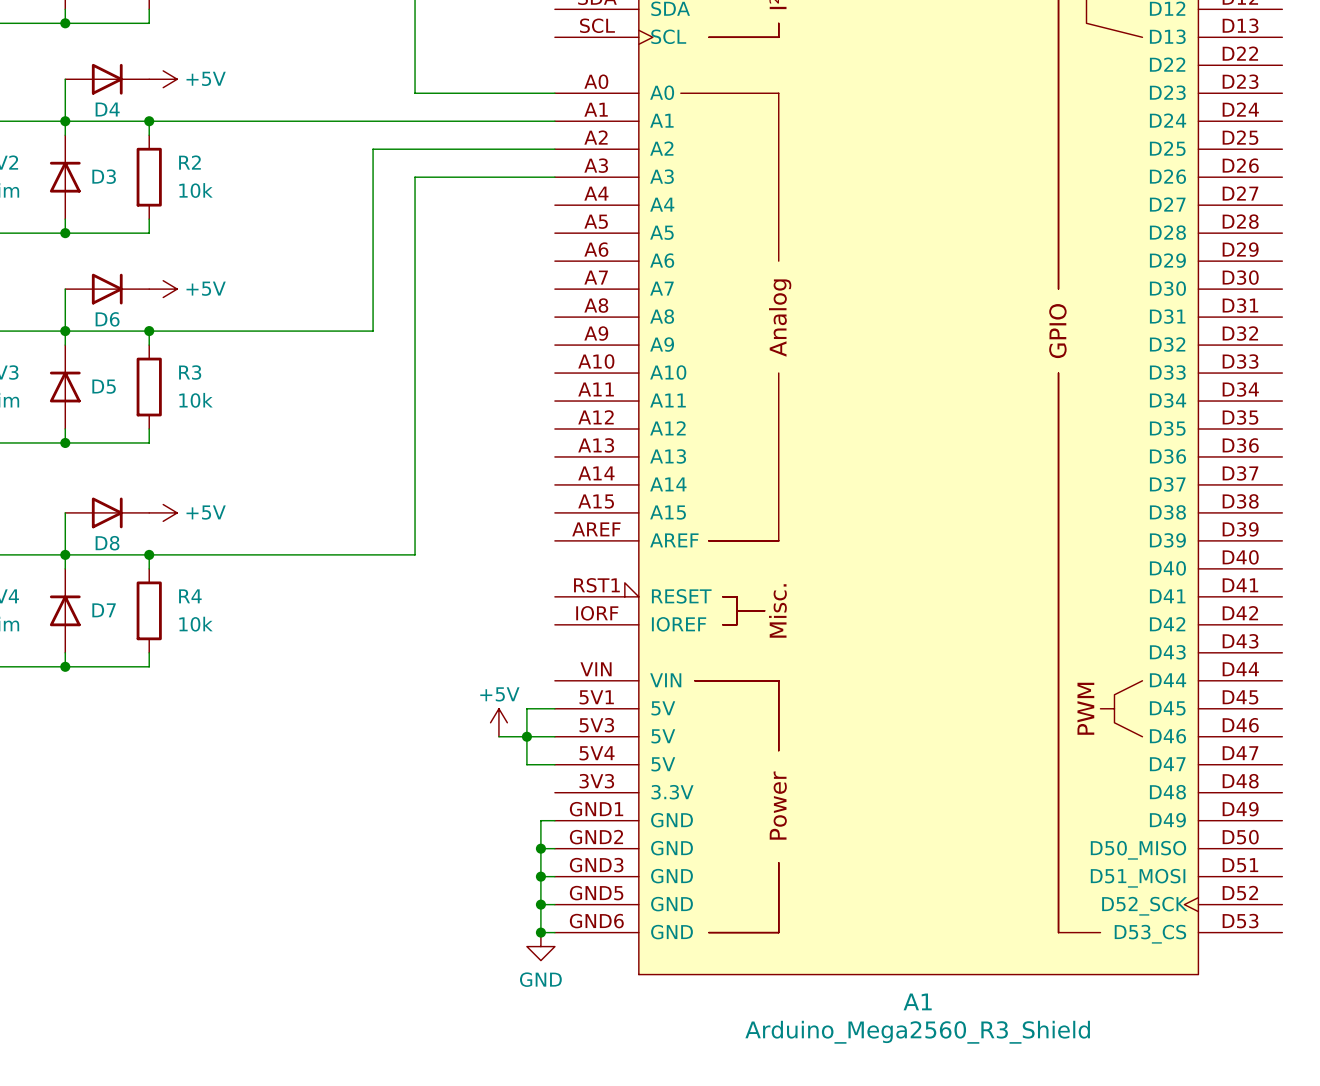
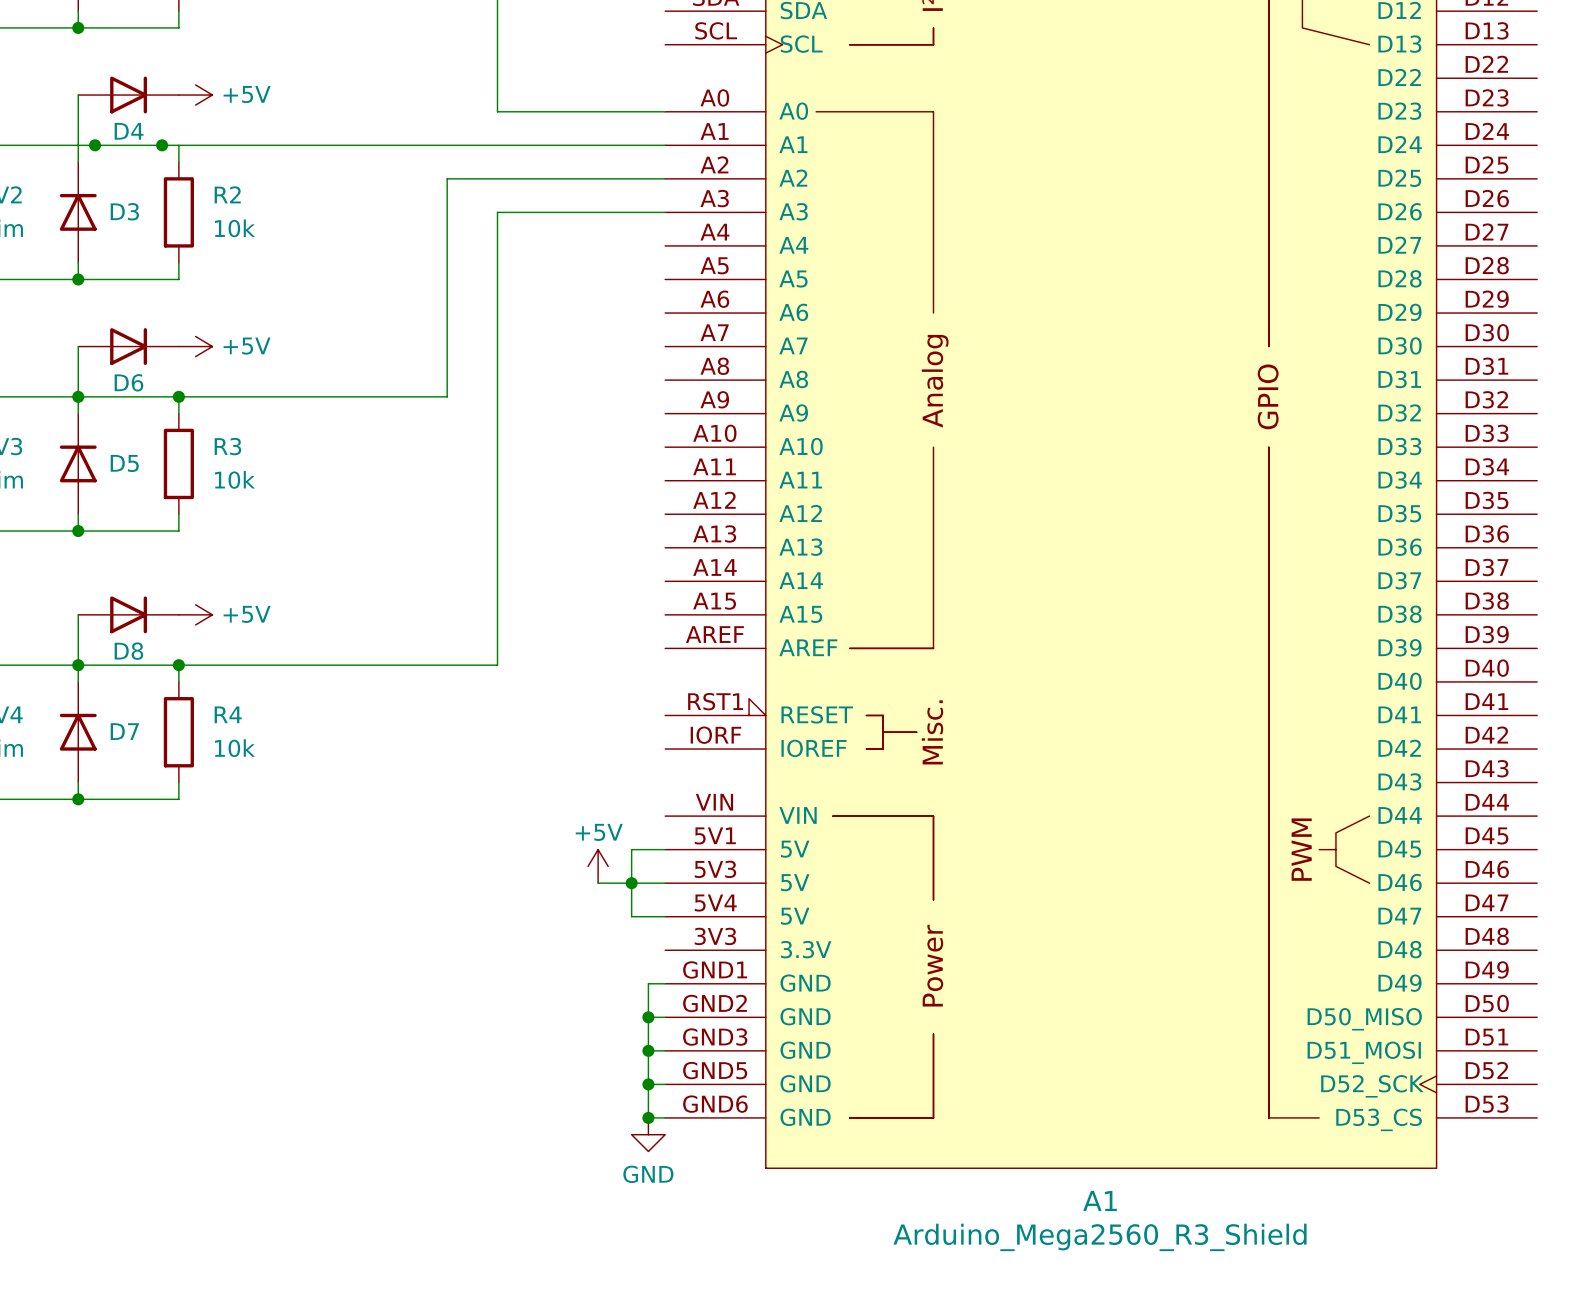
junction position: (65, 121) -> (95, 145)
junction position: (149, 121) -> (162, 145)

